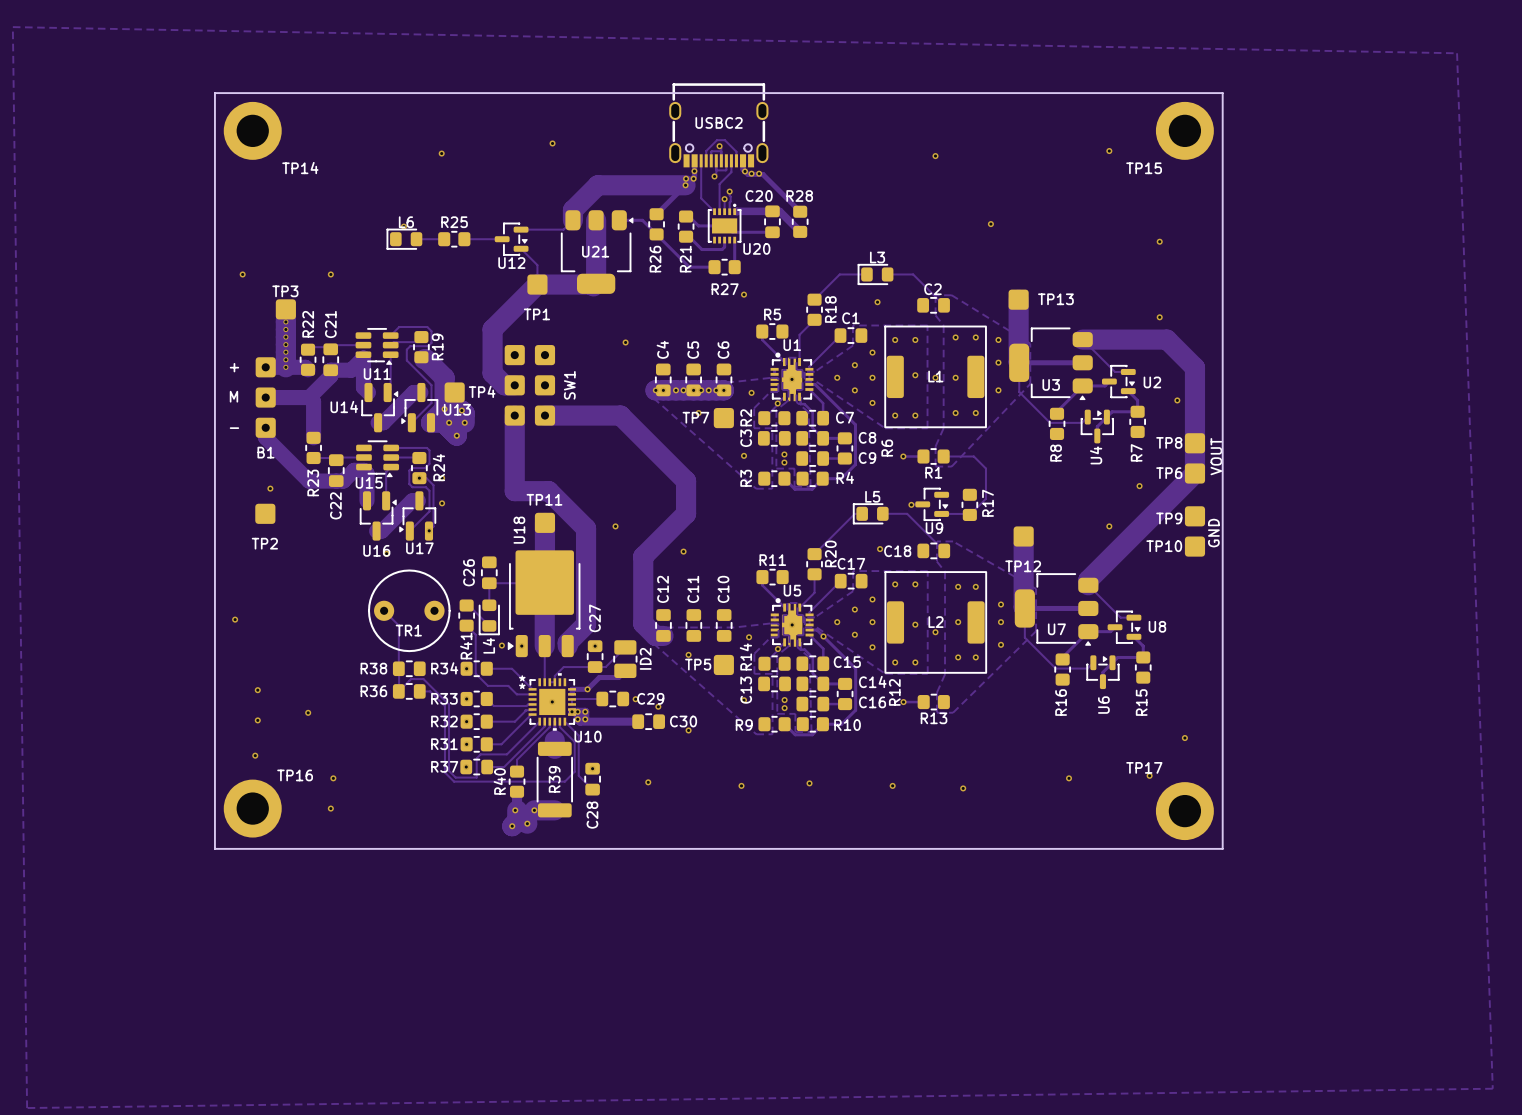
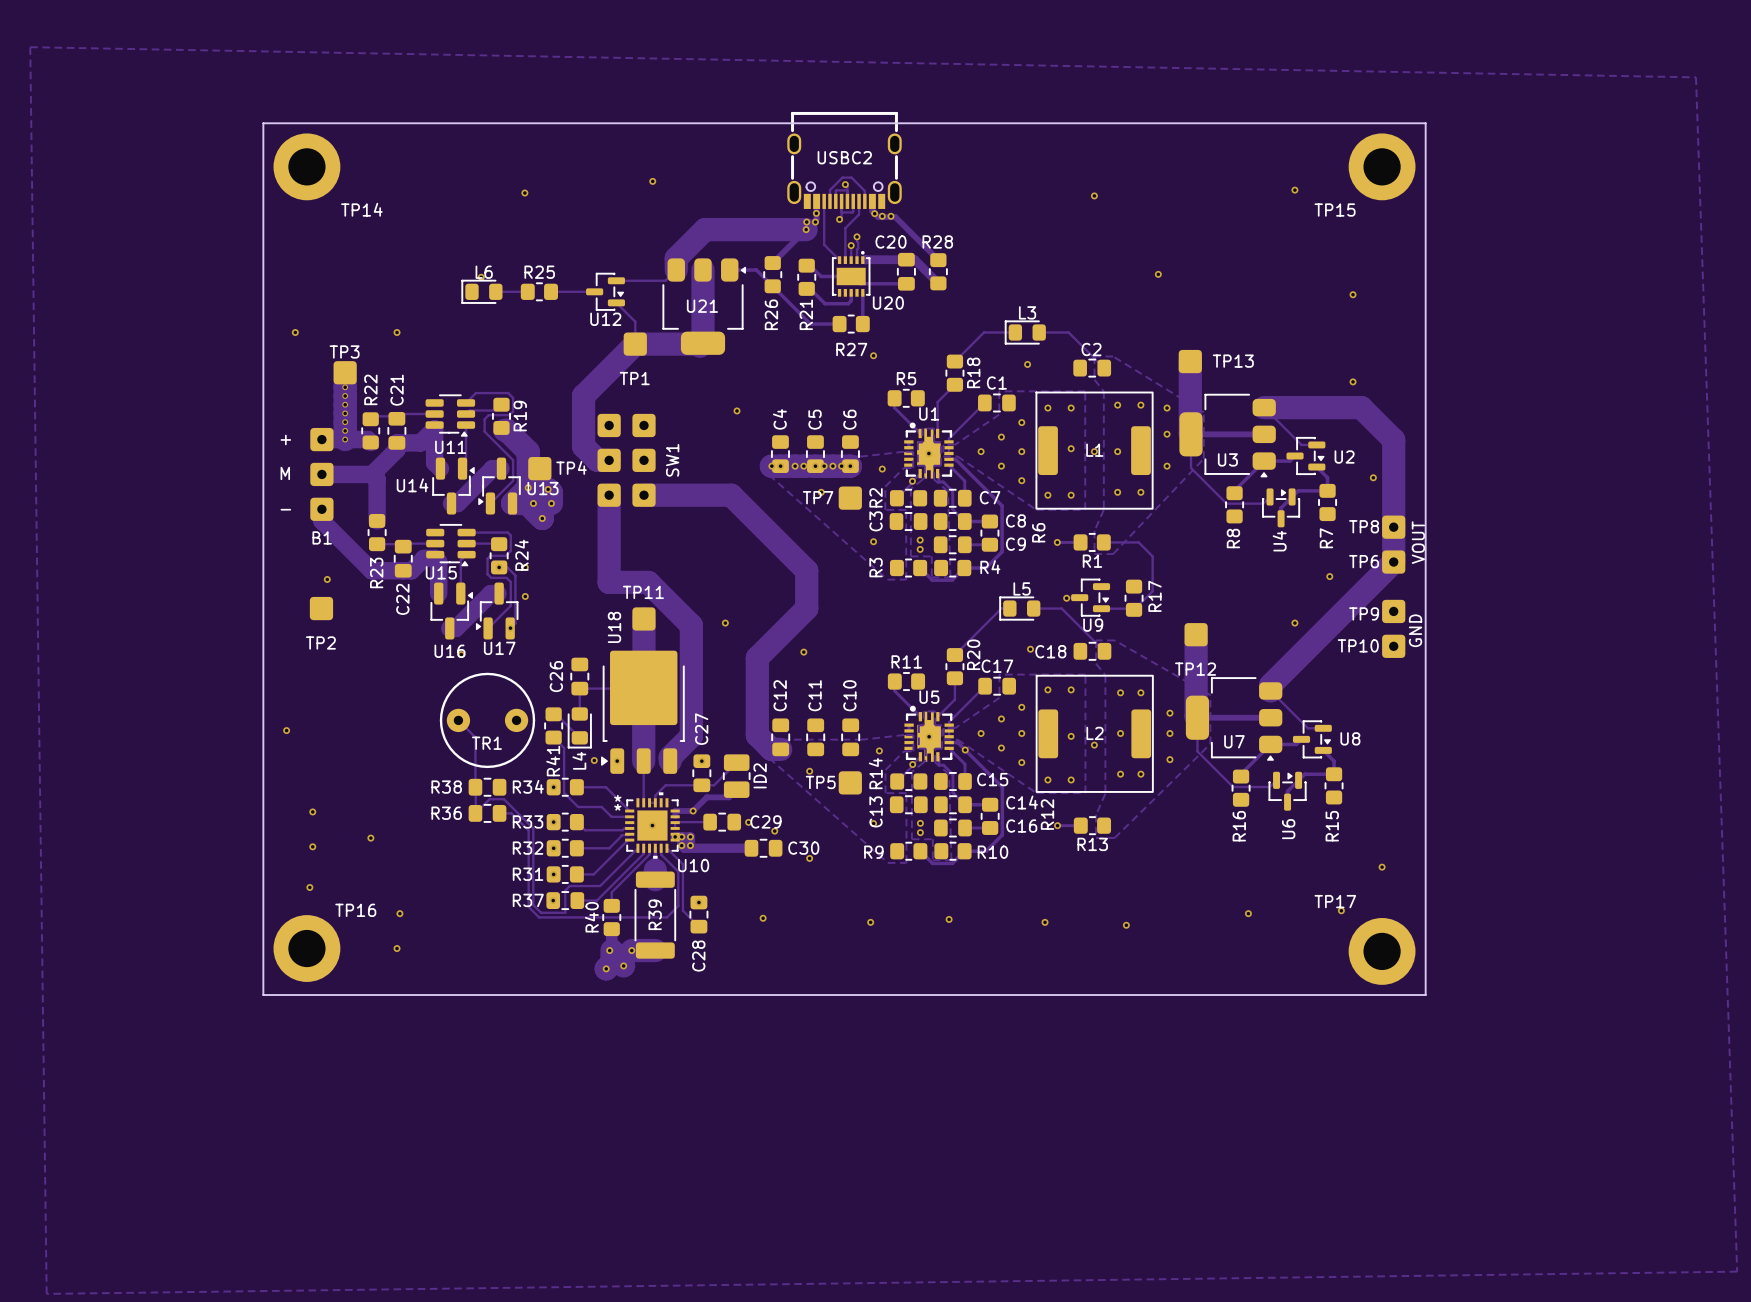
TP8 footprint: [1184, 433, 1206, 454] -> [1382, 515, 1406, 539]
TP6 footprint: [1184, 463, 1206, 484] -> [1382, 550, 1406, 574]
TP9 footprint: [1184, 506, 1206, 527] -> [1382, 599, 1406, 624]
TP10 footprint: [1184, 536, 1206, 557] -> [1382, 634, 1406, 658]

